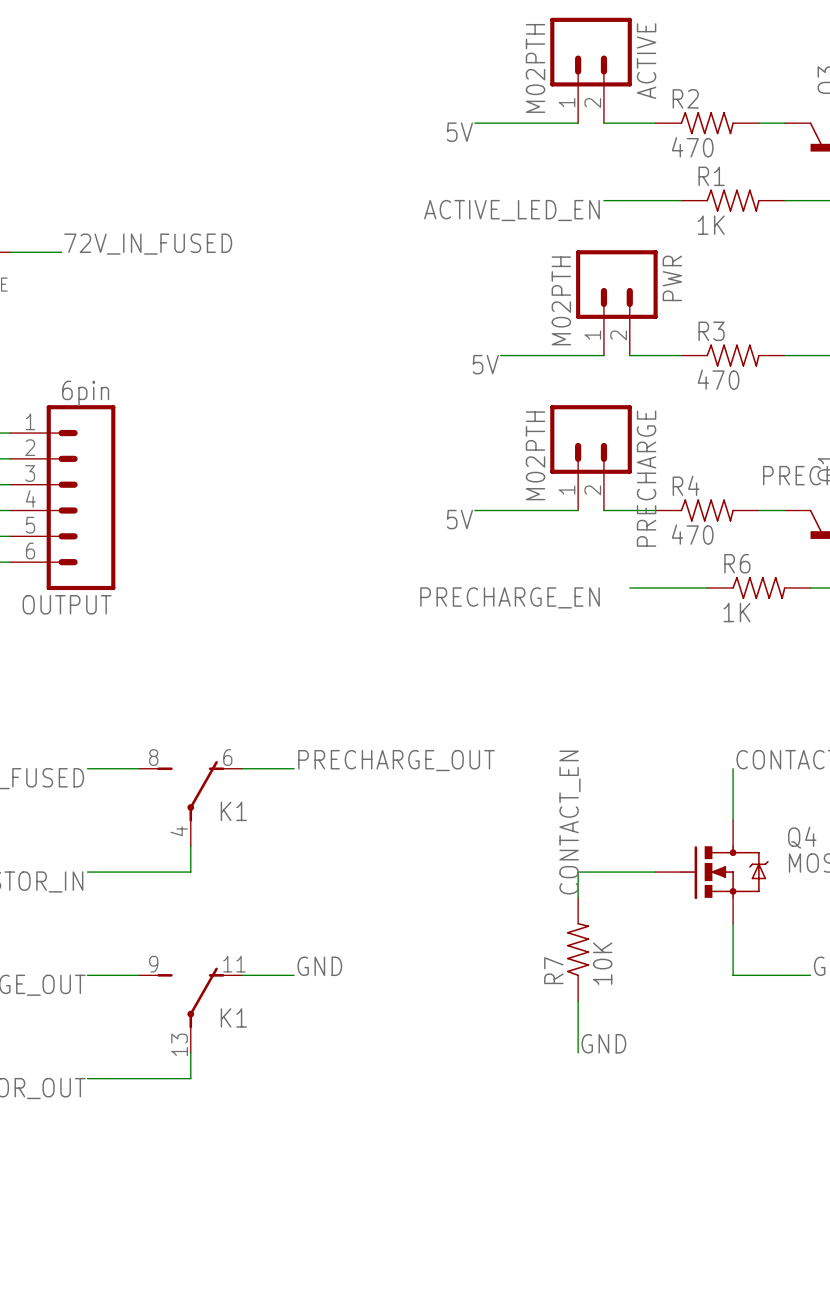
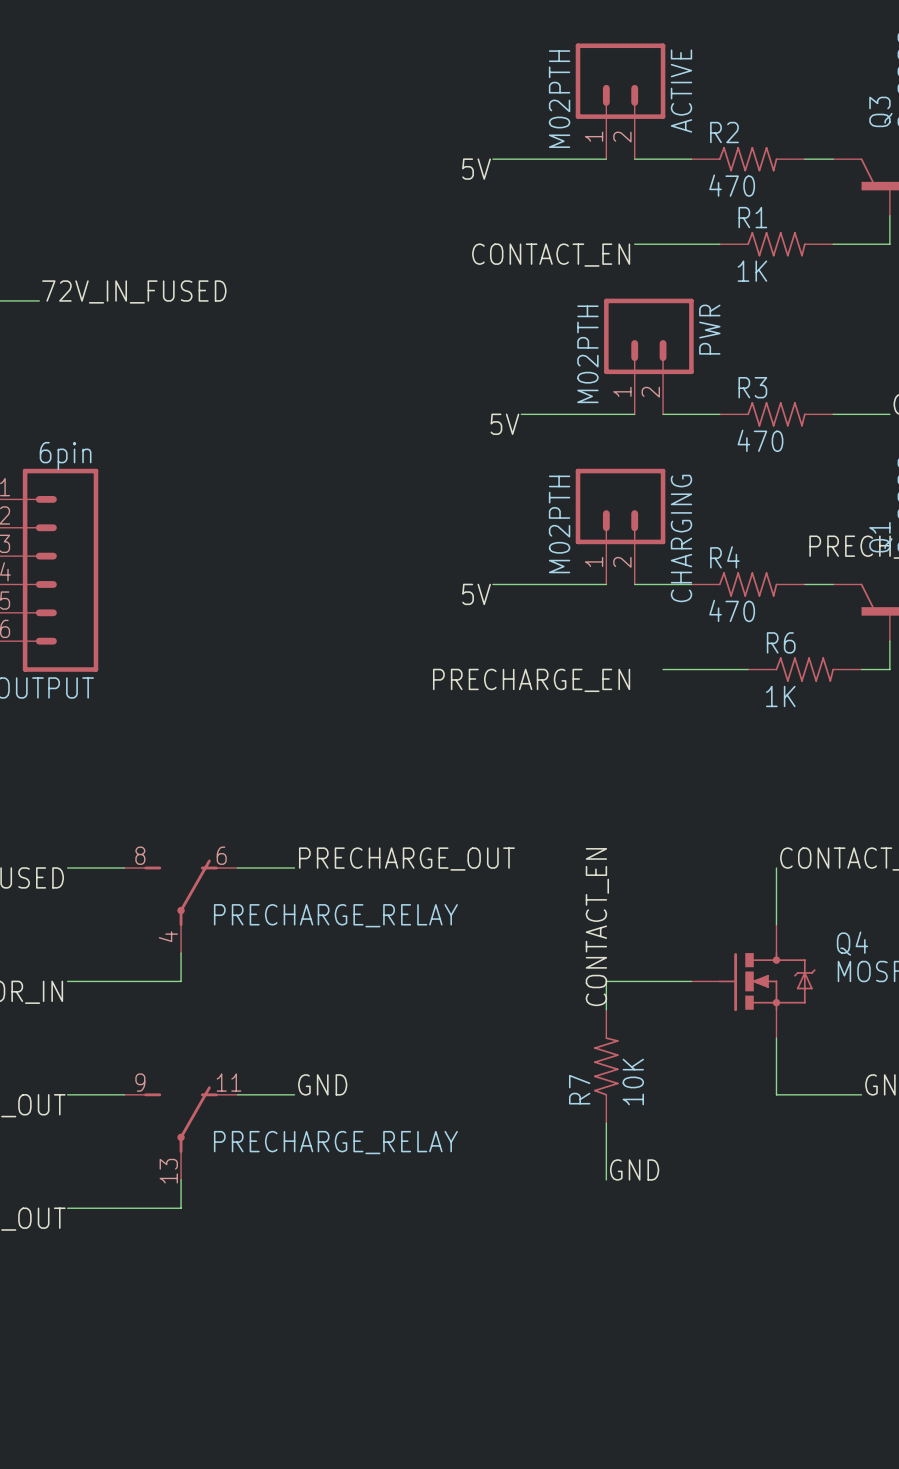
label: ACTIVE_LED_EN (511, 210) -> CONTACT_EN (551, 255)
PRECHARGE name: PRECHARGE (646, 478) -> CHARGING (681, 538)
K1 name: K1 (233, 811) -> PRECHARGE_RELAY (335, 915)
K1 name: K1 (233, 1017) -> PRECHARGE_RELAY (335, 1142)

